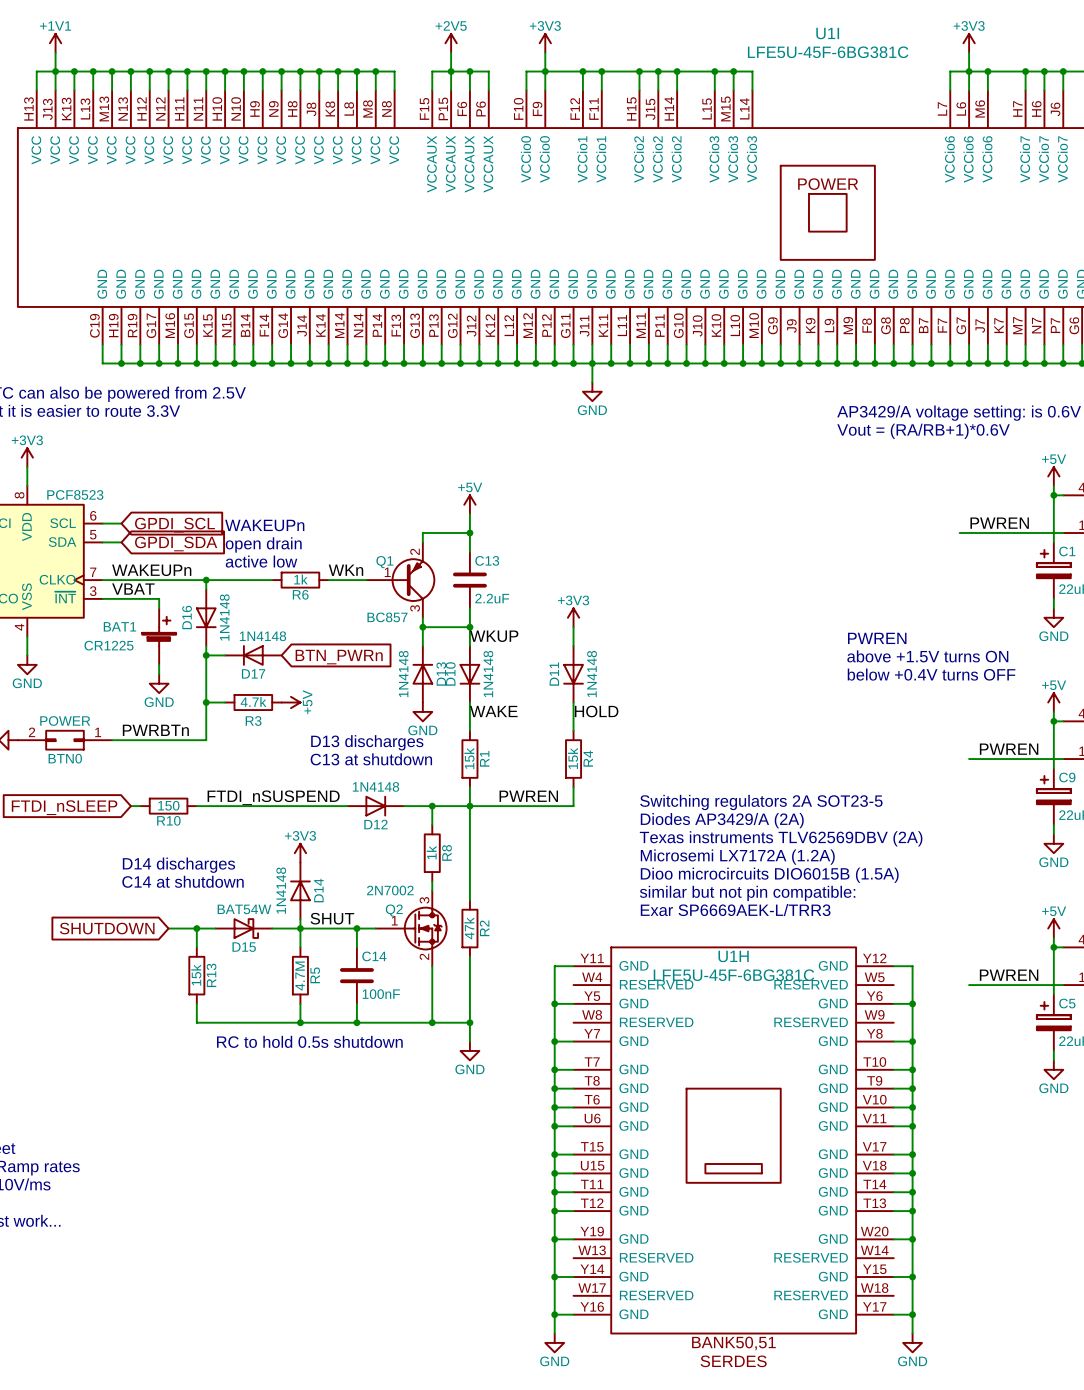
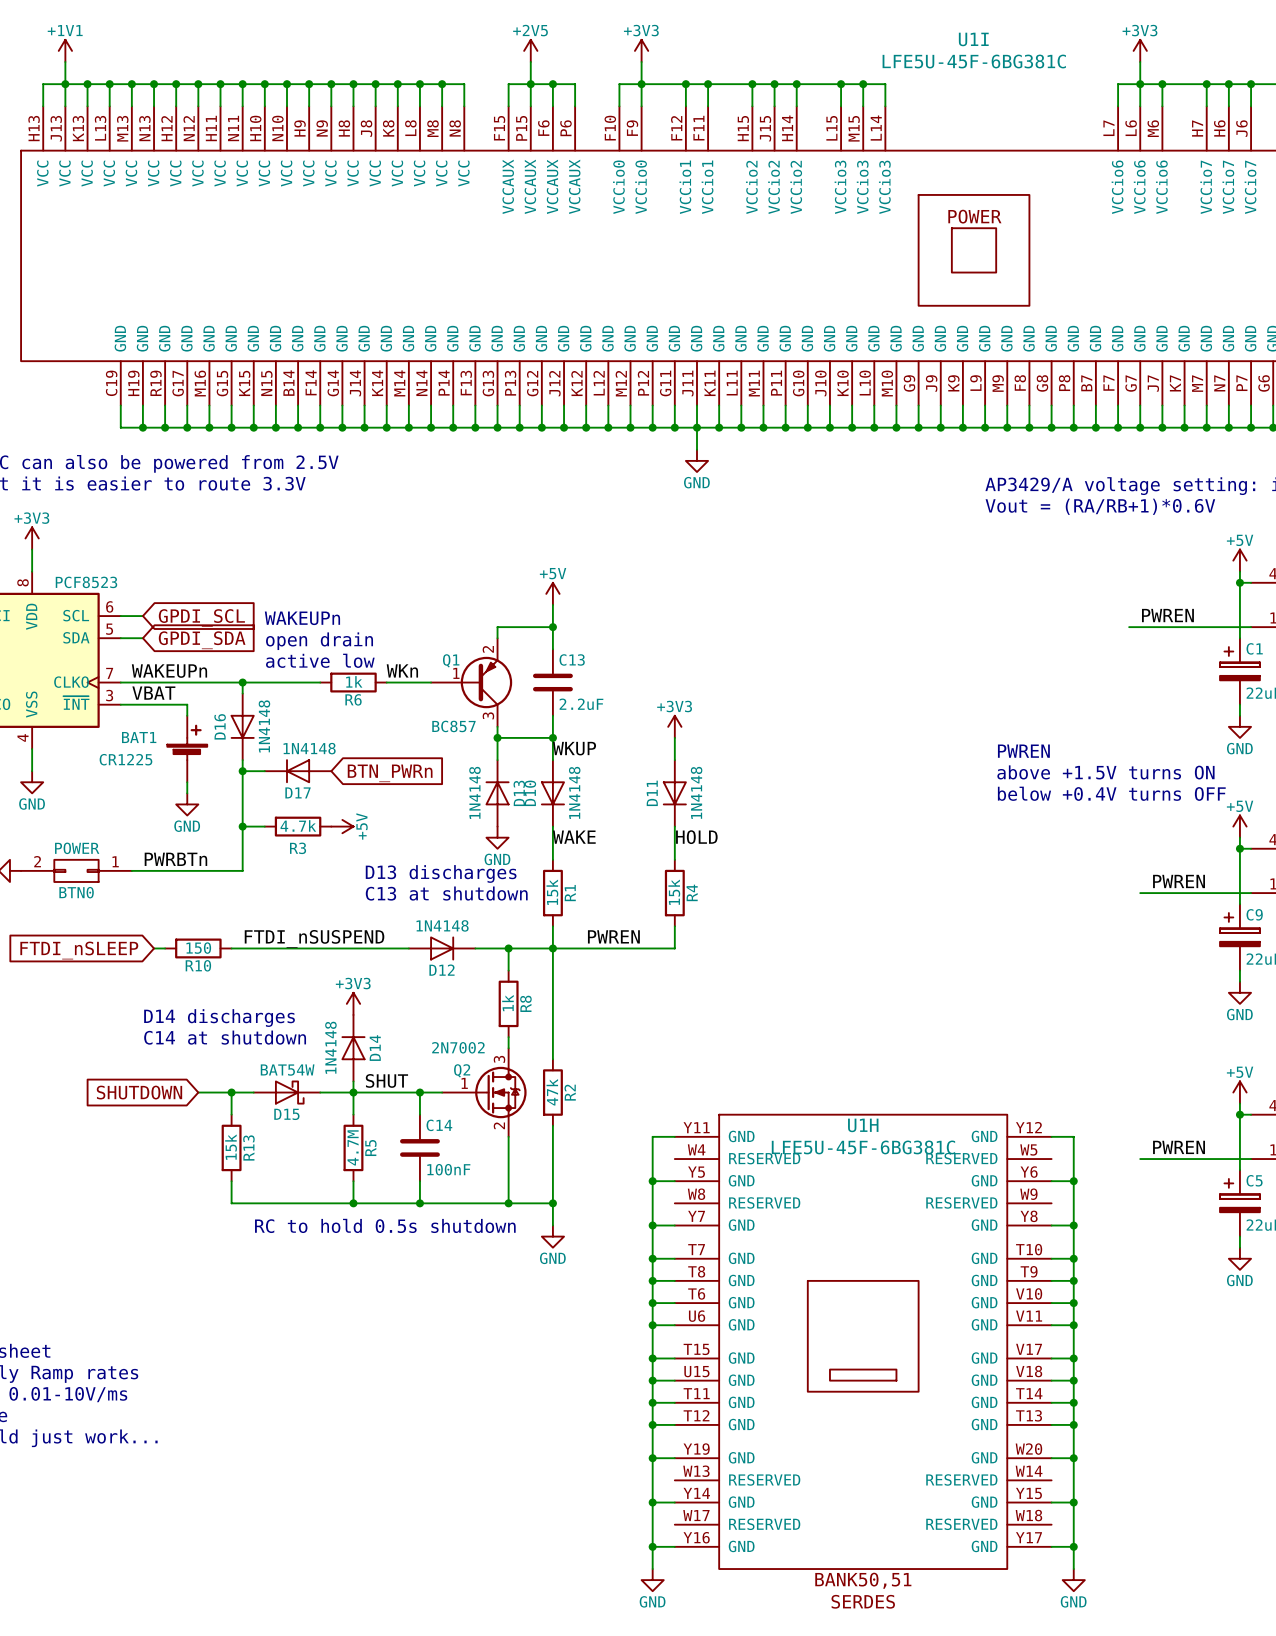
text: Switching regulators 2A SOT23-5 (761, 802) -> none
text: Diodes AP3429/A (2A) (722, 820) -> none
text: Texas instruments TLV62569DBV (2A) (781, 838) -> none
text: Microsemi LX7172A (1.2A) (737, 857) -> none
text: Dioo microcircuits DIO6015B (1.5A) (769, 875) -> none
text: similar but not pin compatible: (747, 893) -> none
text: Exar SP6669AEK-L/TRR3 (735, 910) -> none

